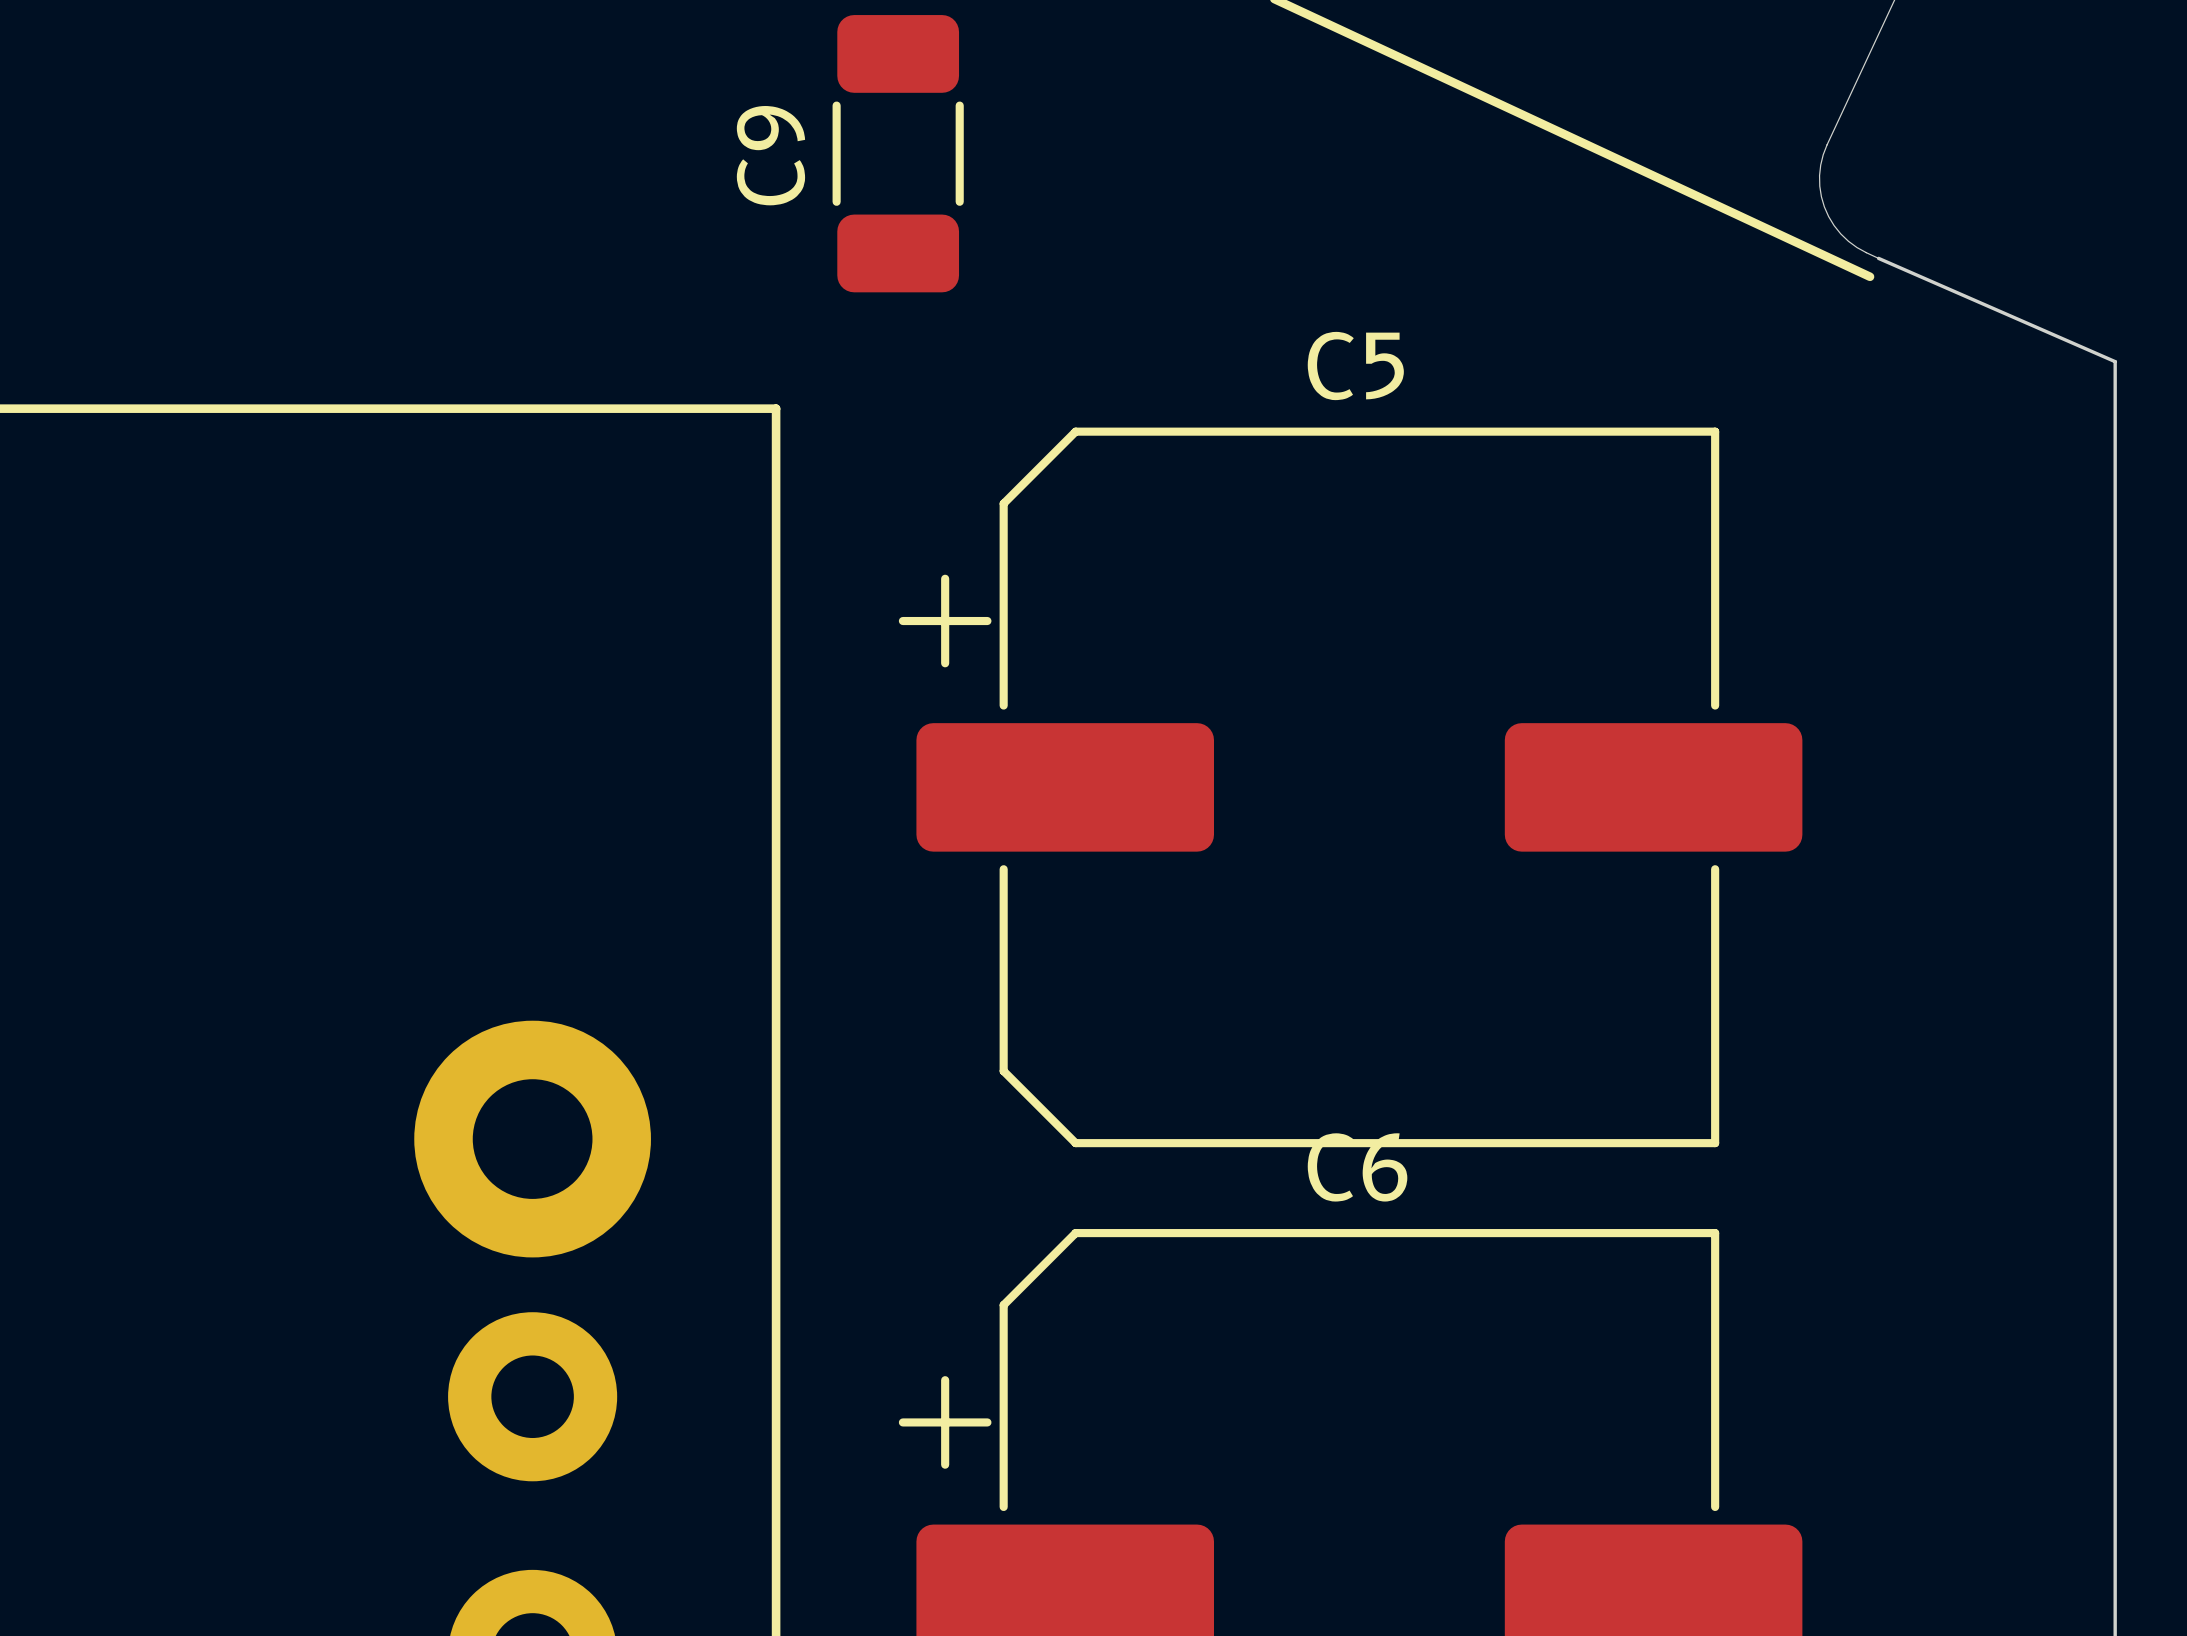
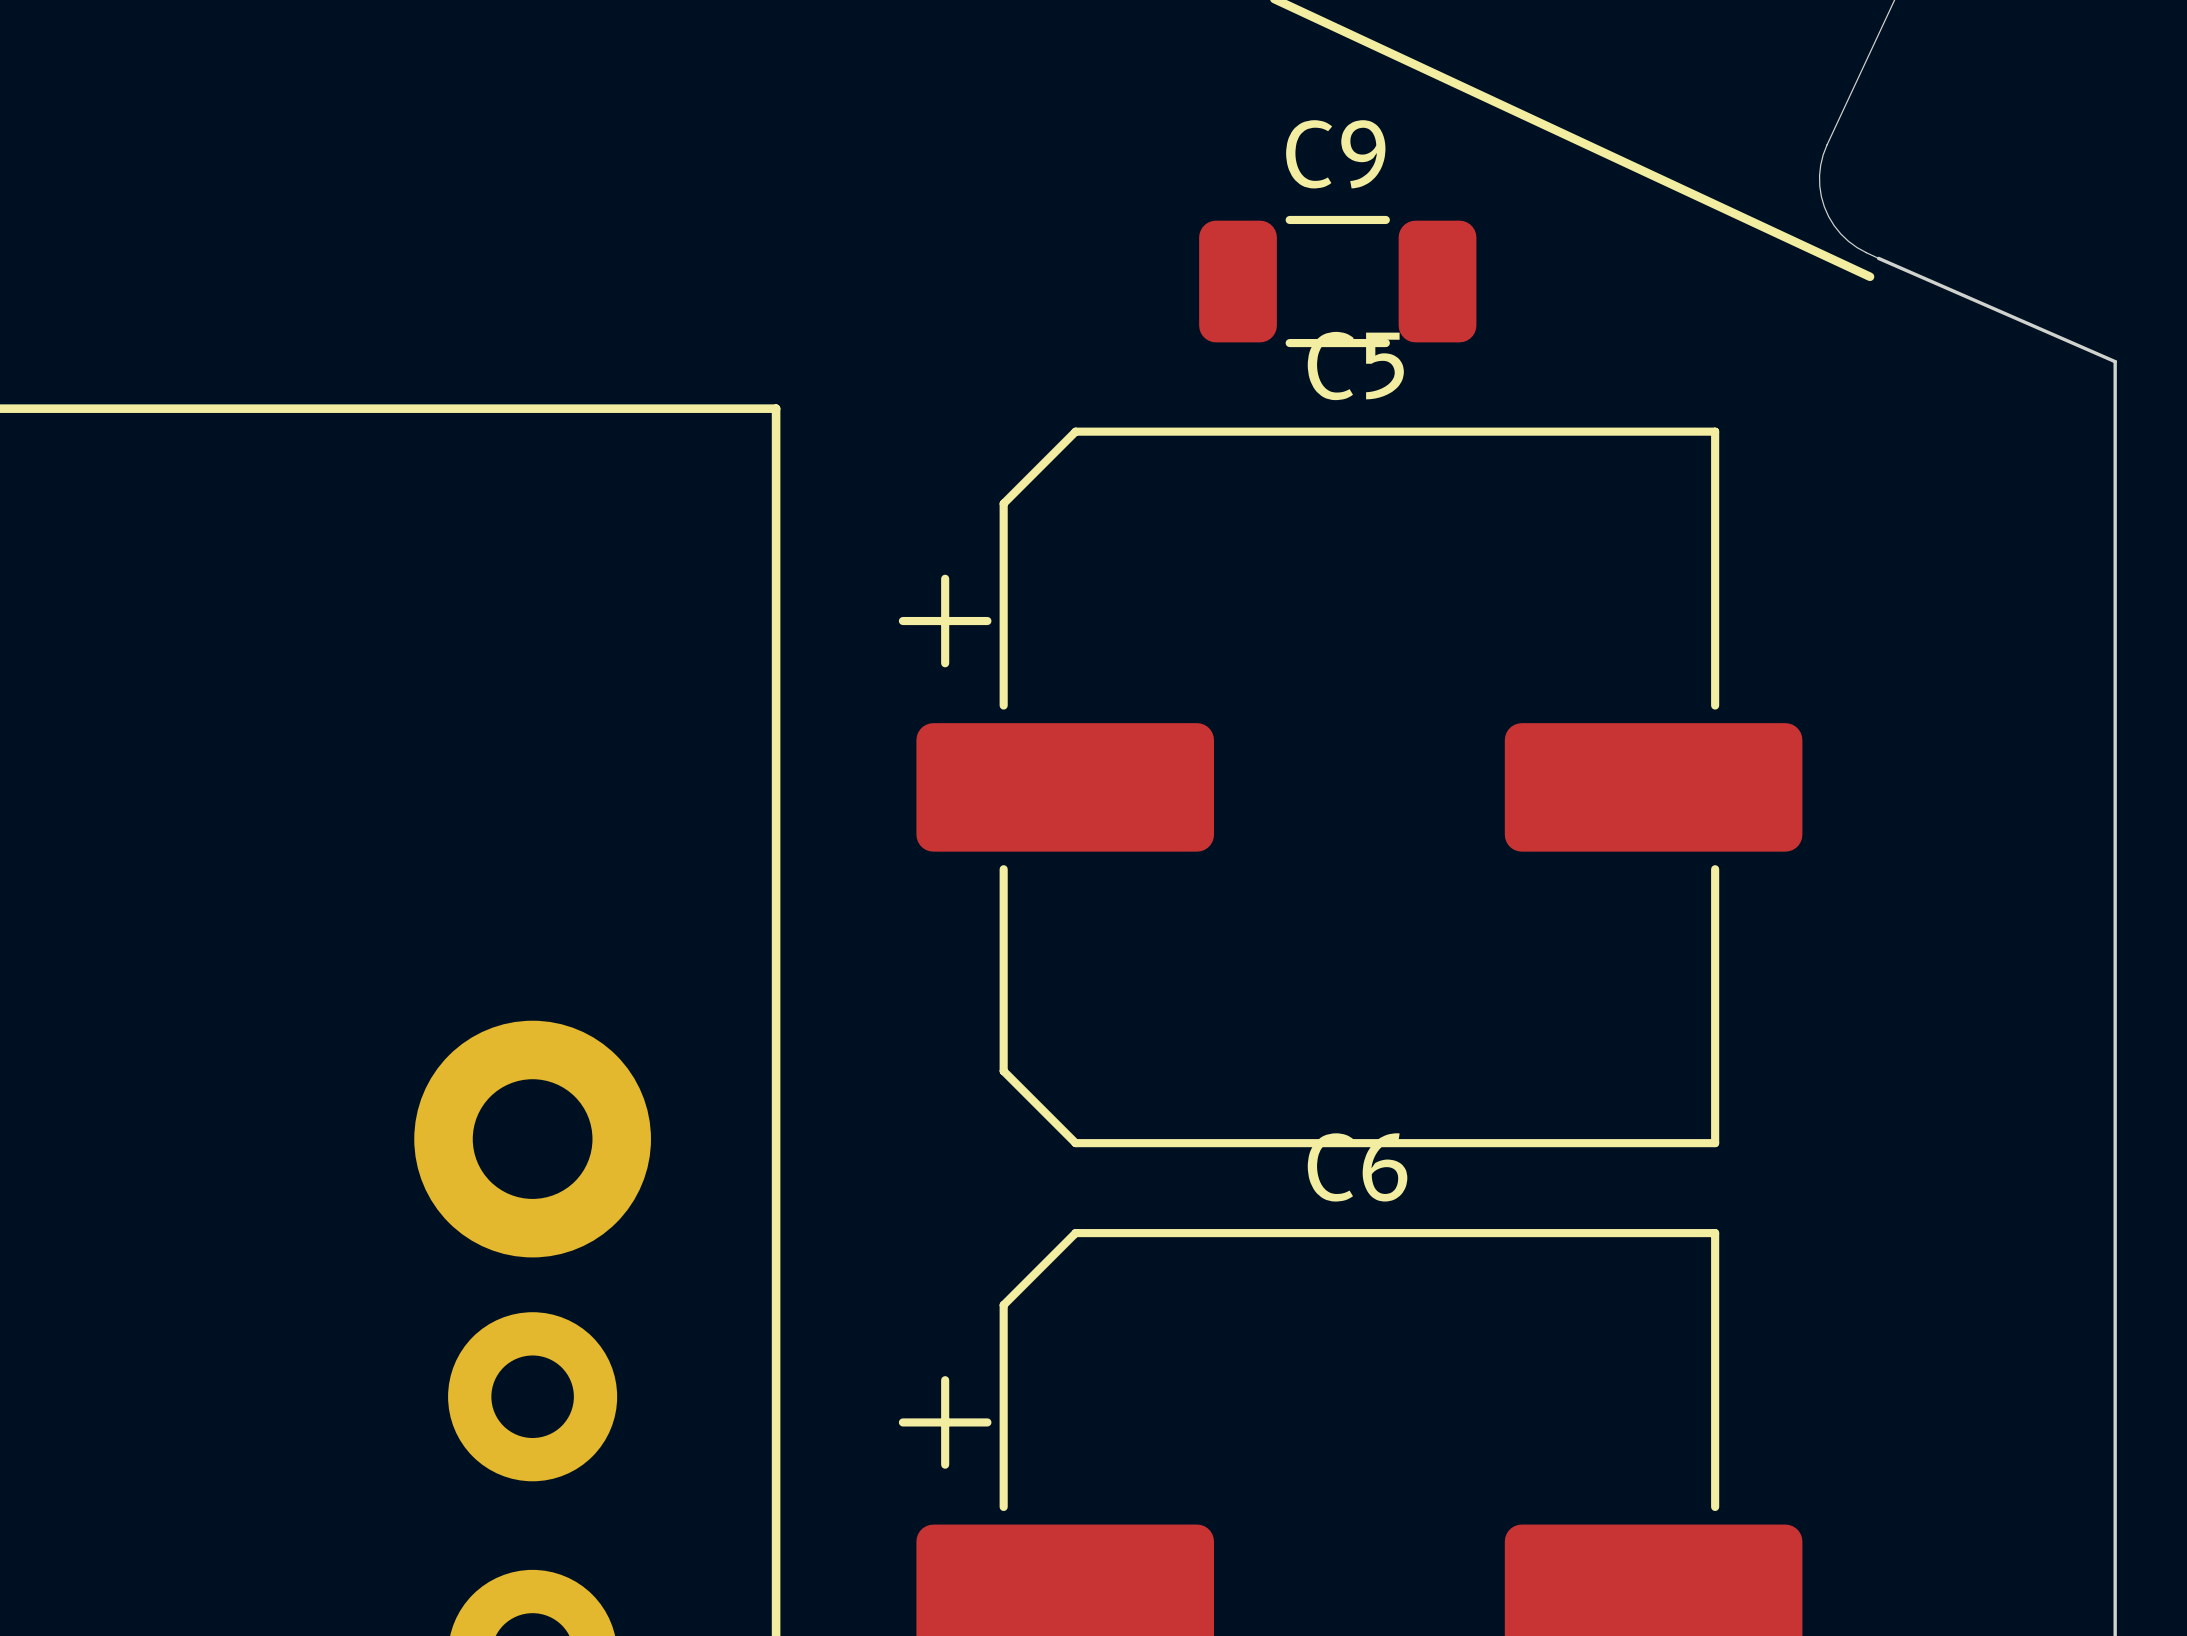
C9 rotation: 0° (898, 153) -> 90° clockwise (1337, 281)
C9 position: (898, 153) -> (1337, 281)

